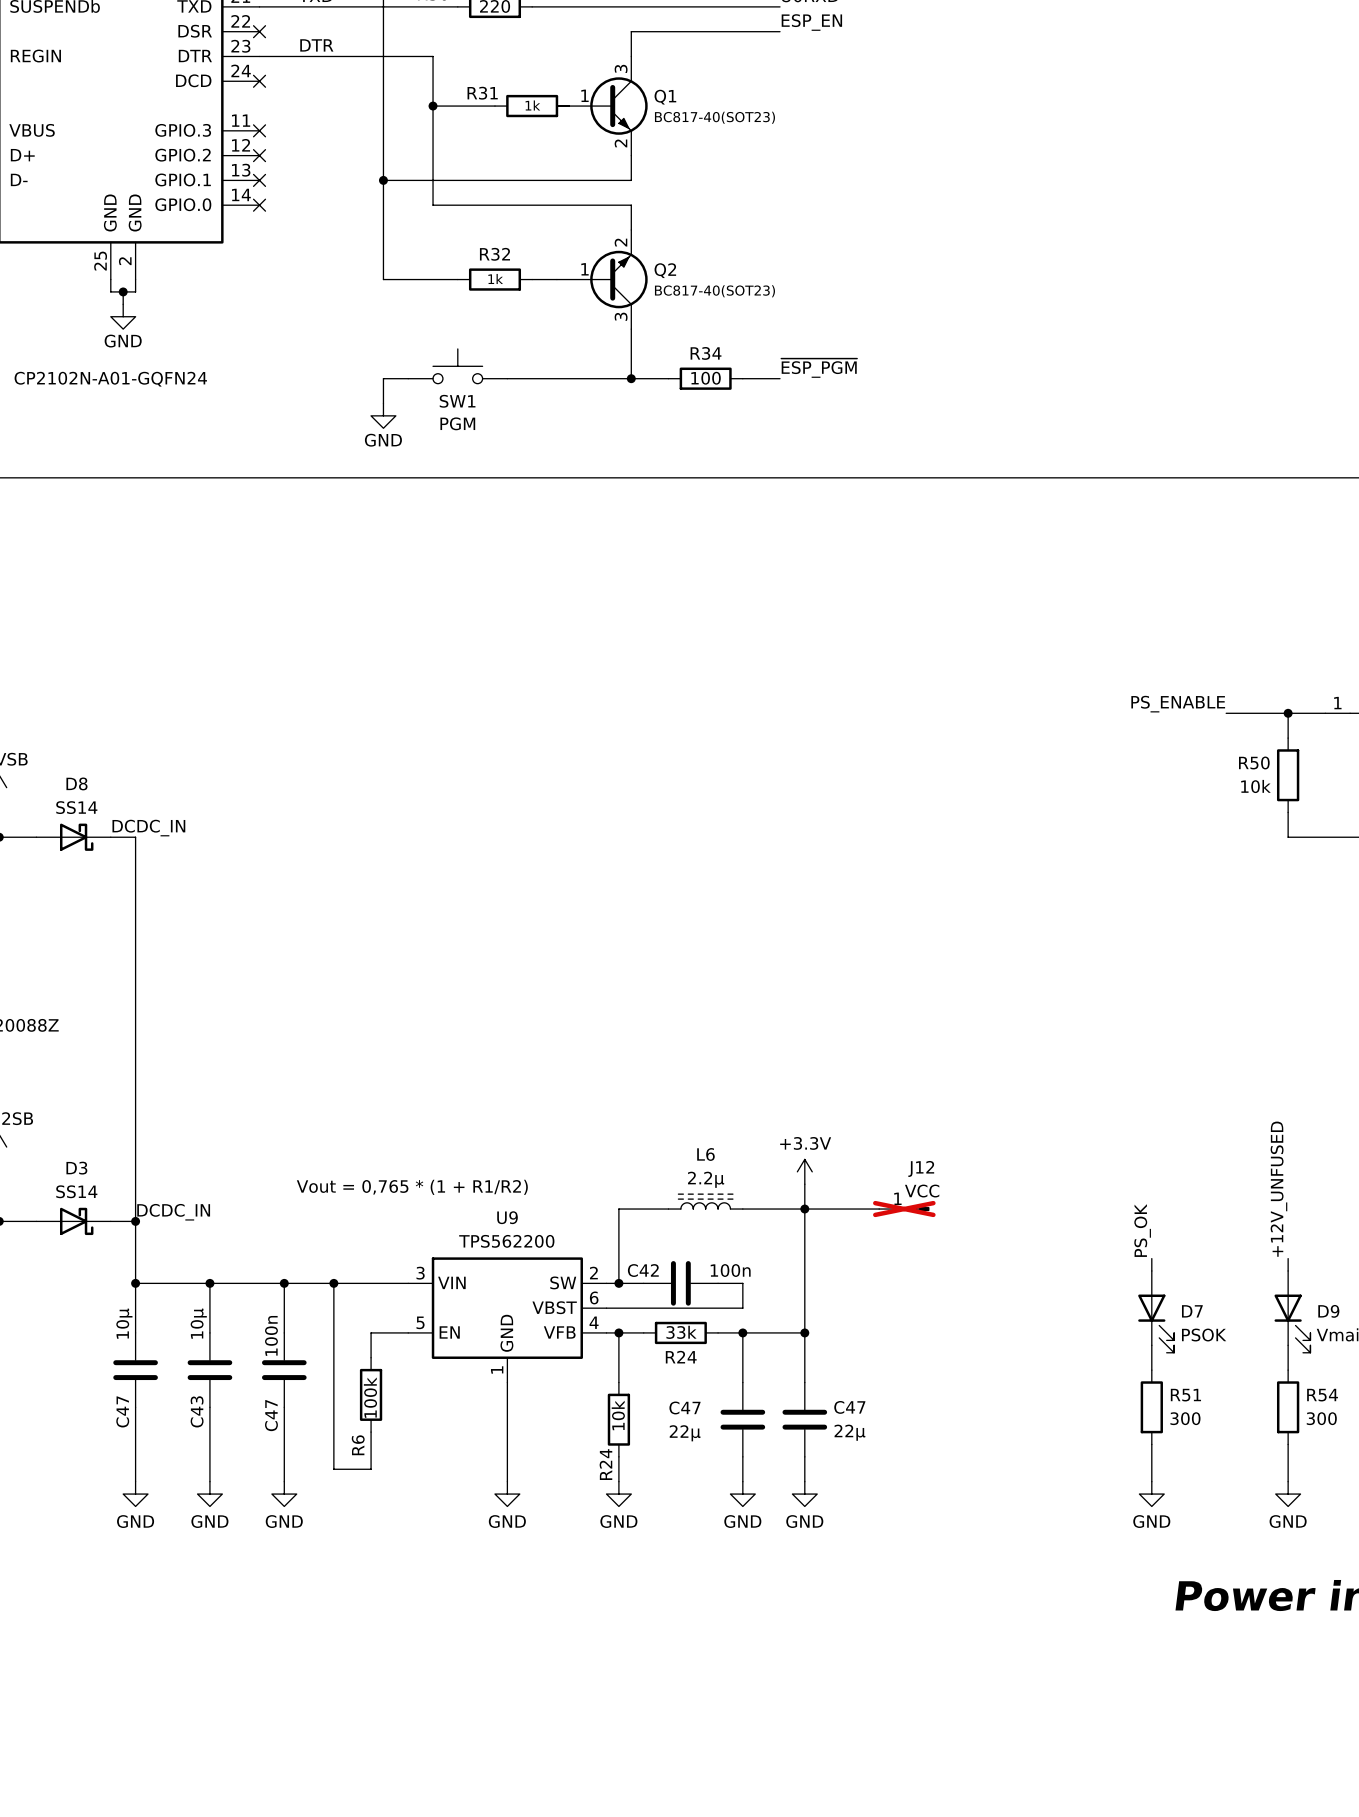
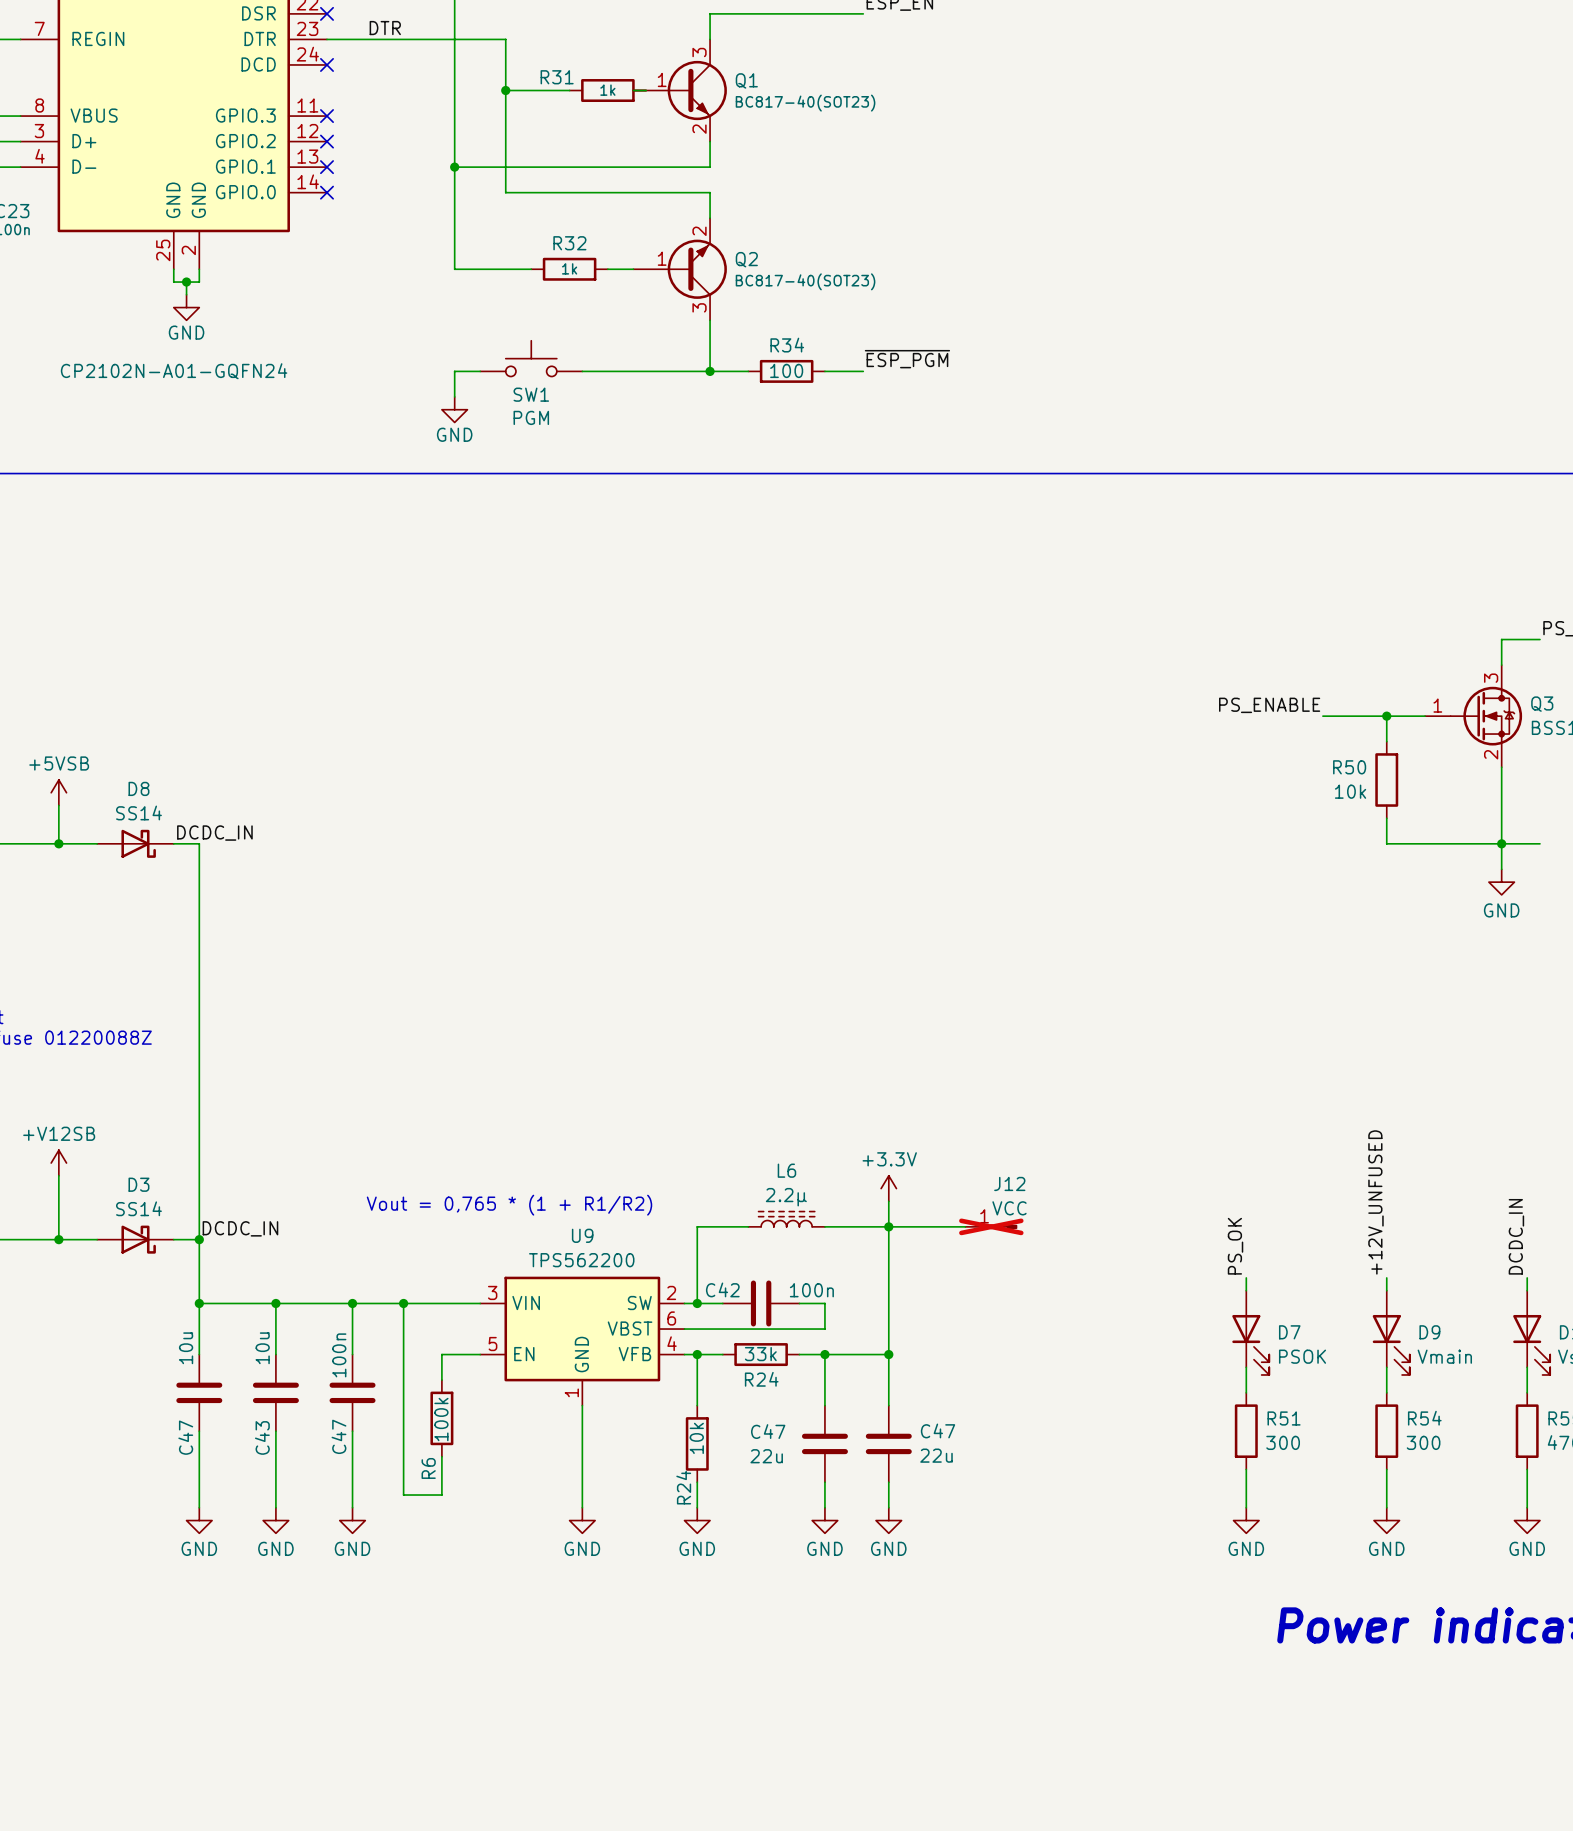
C47 value: 10µ (124, 1323) -> 10u (186, 1348)
C43 value: 10µ (198, 1323) -> 10u (262, 1348)
C47 value: 22µ (849, 1432) -> 22u (936, 1455)
C47 value: 22µ (685, 1433) -> 22u (766, 1456)

